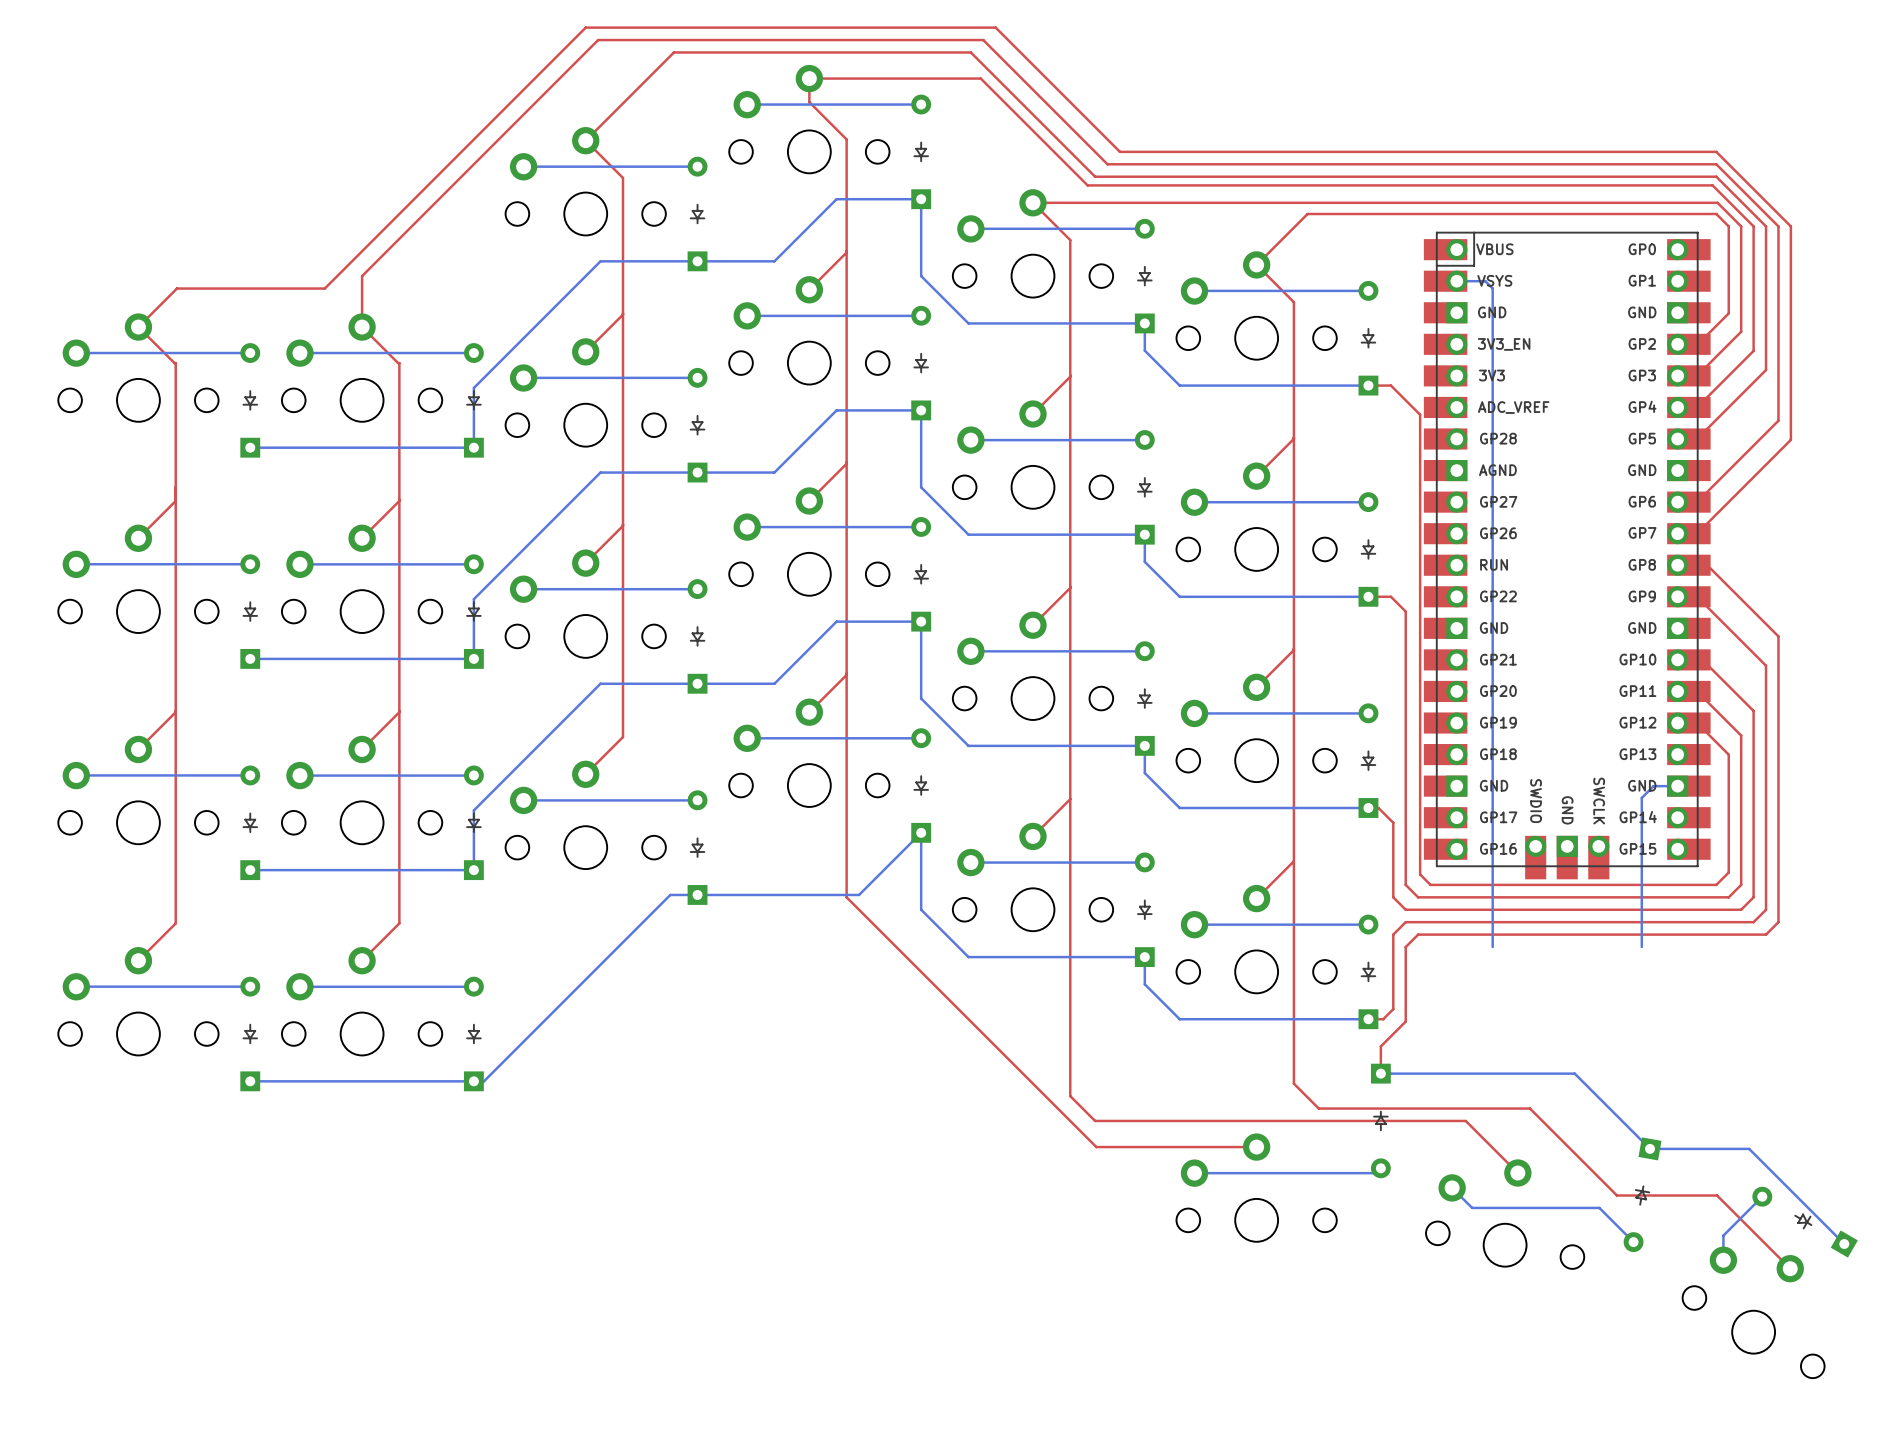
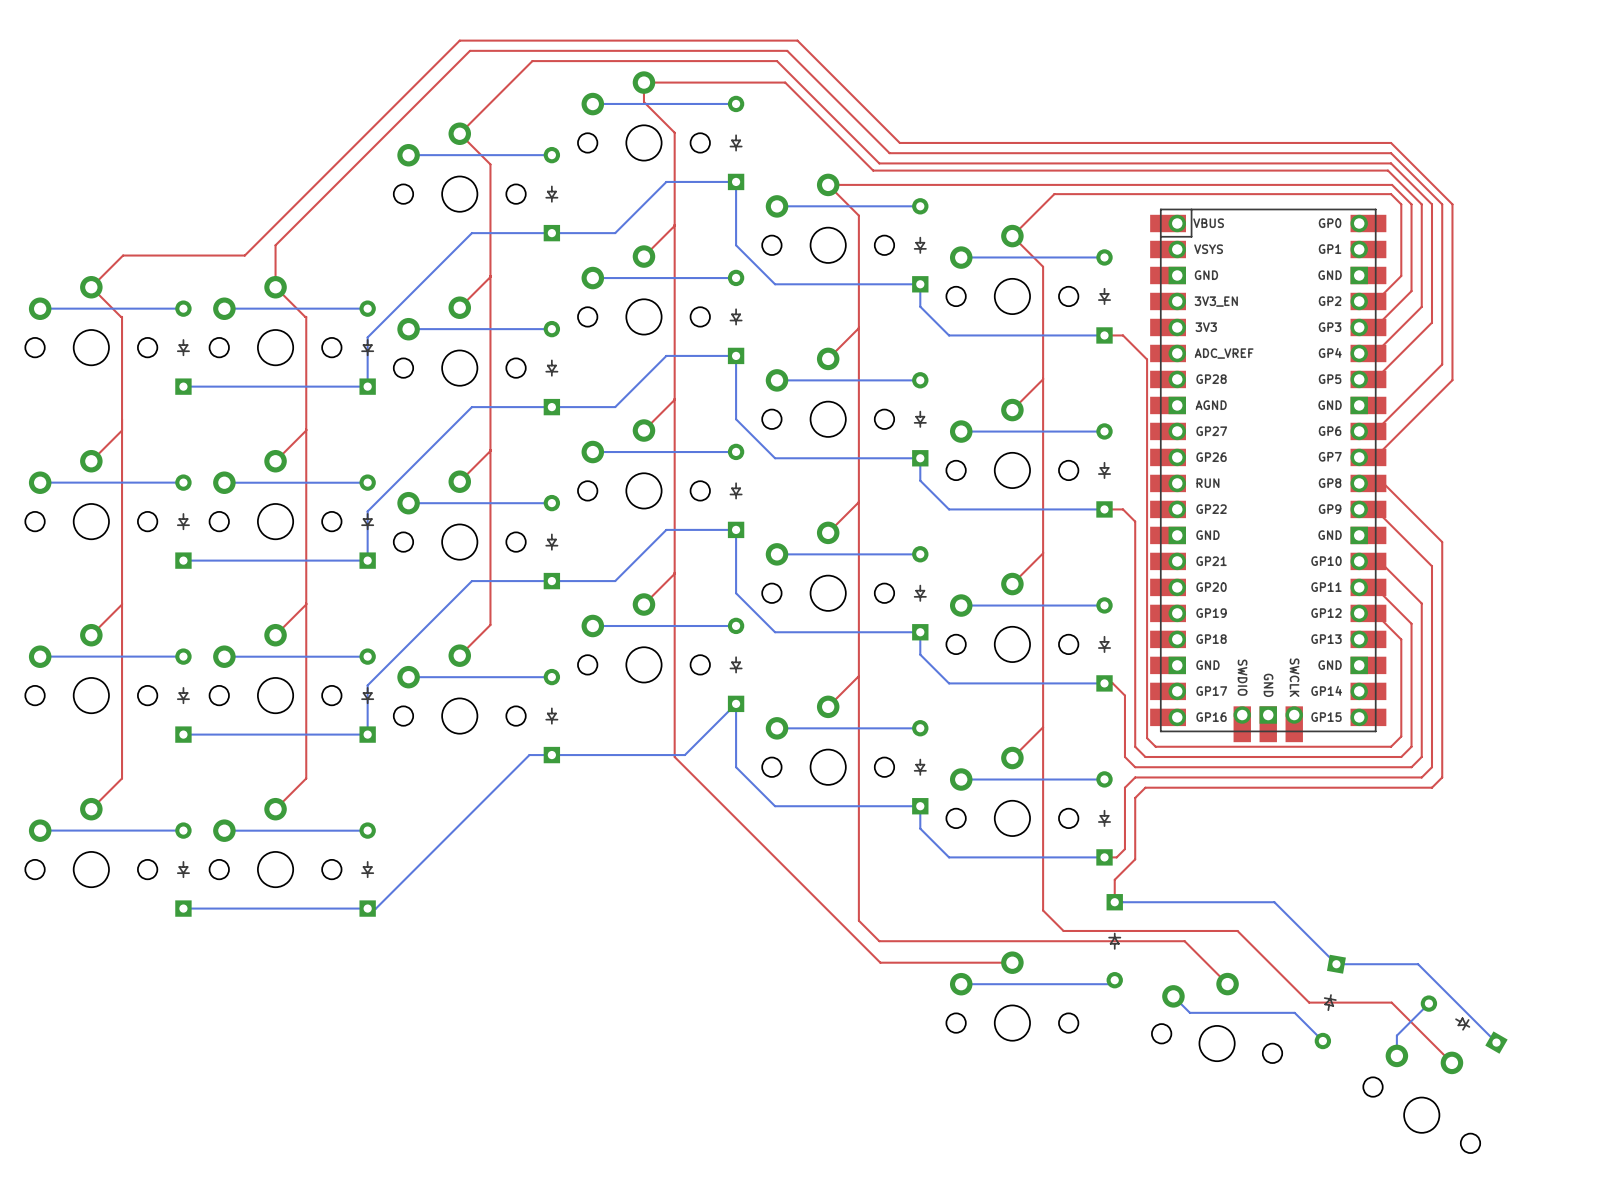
bottom track: (1456, 281) (1485, 281) (1492, 288) (1492, 947) -> none
bottom track: (1677, 786) (1653, 786) (1641, 797) (1641, 947) -> none

